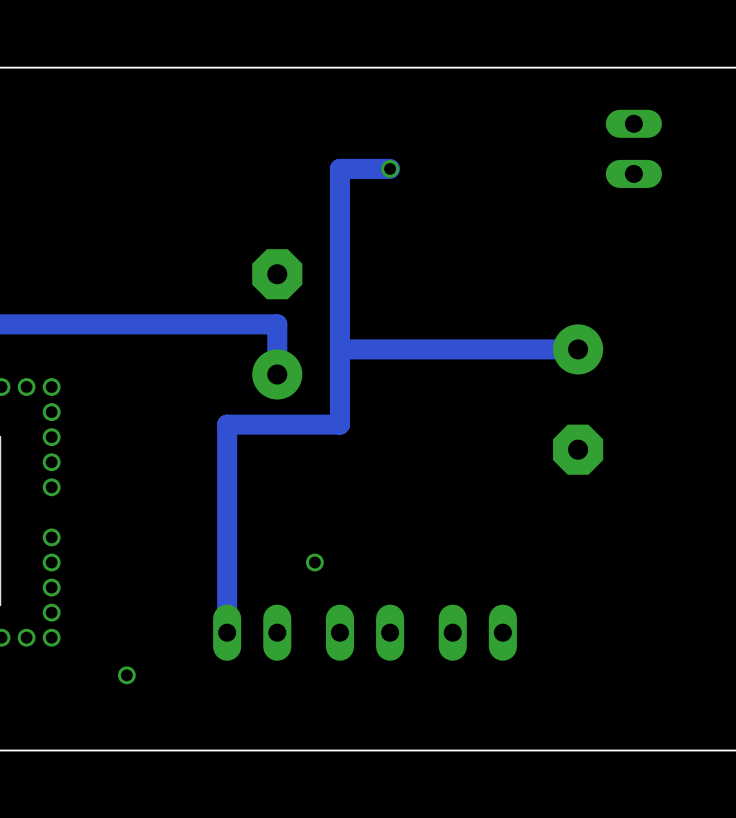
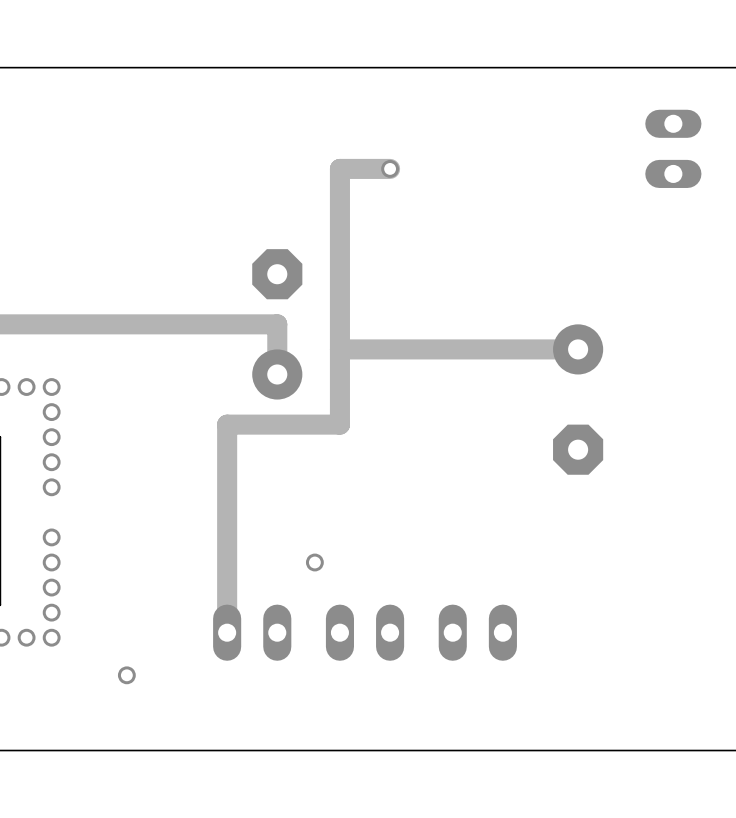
part position: (633, 148) -> (673, 148)

